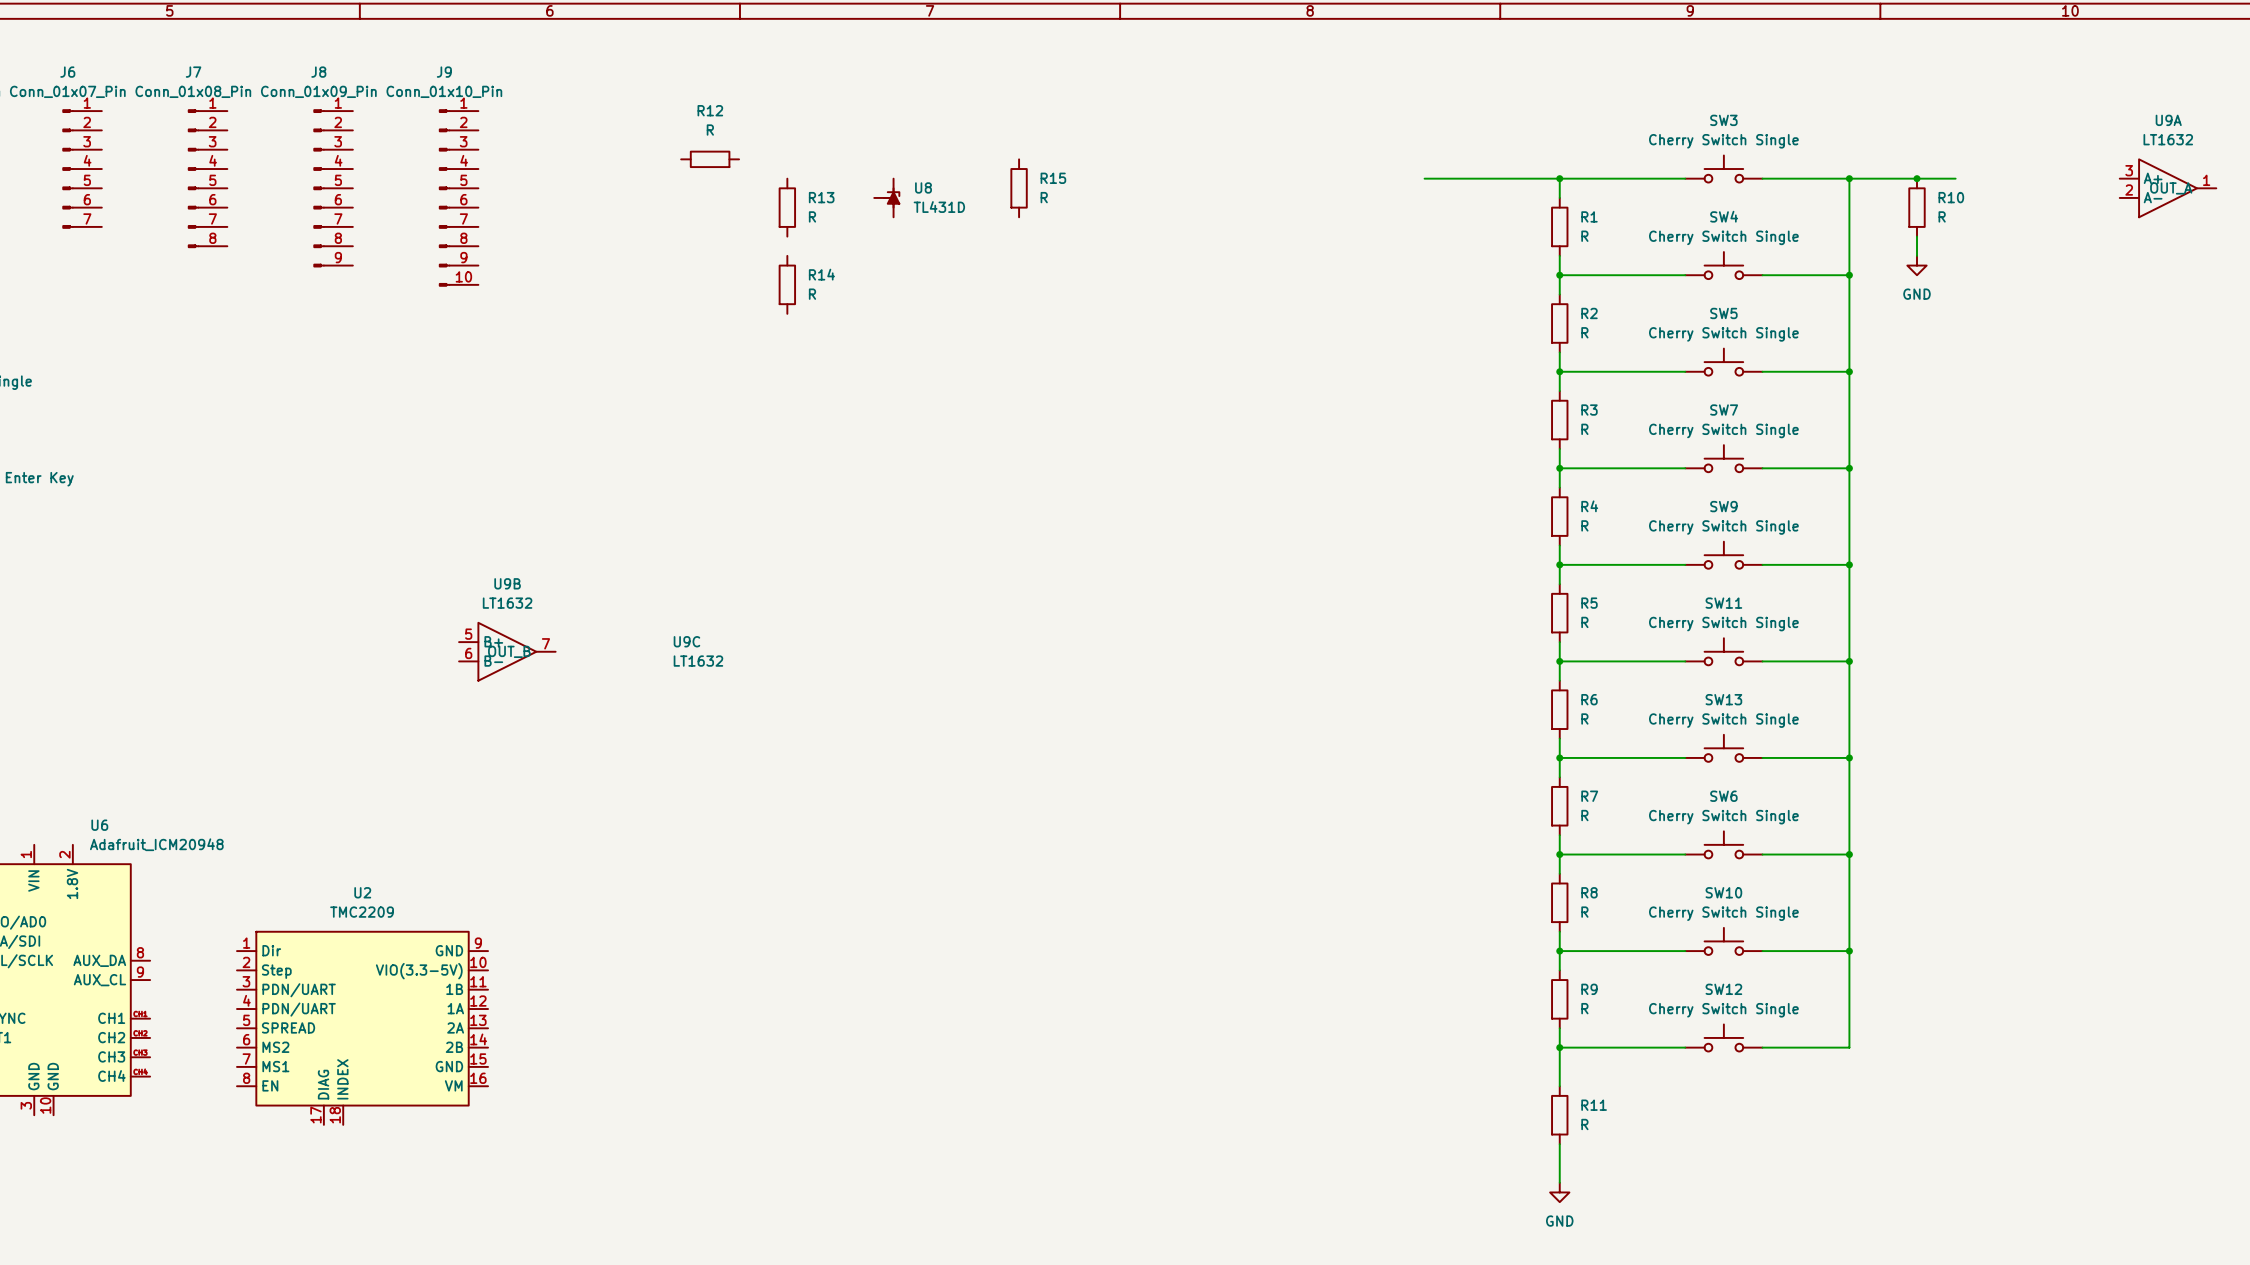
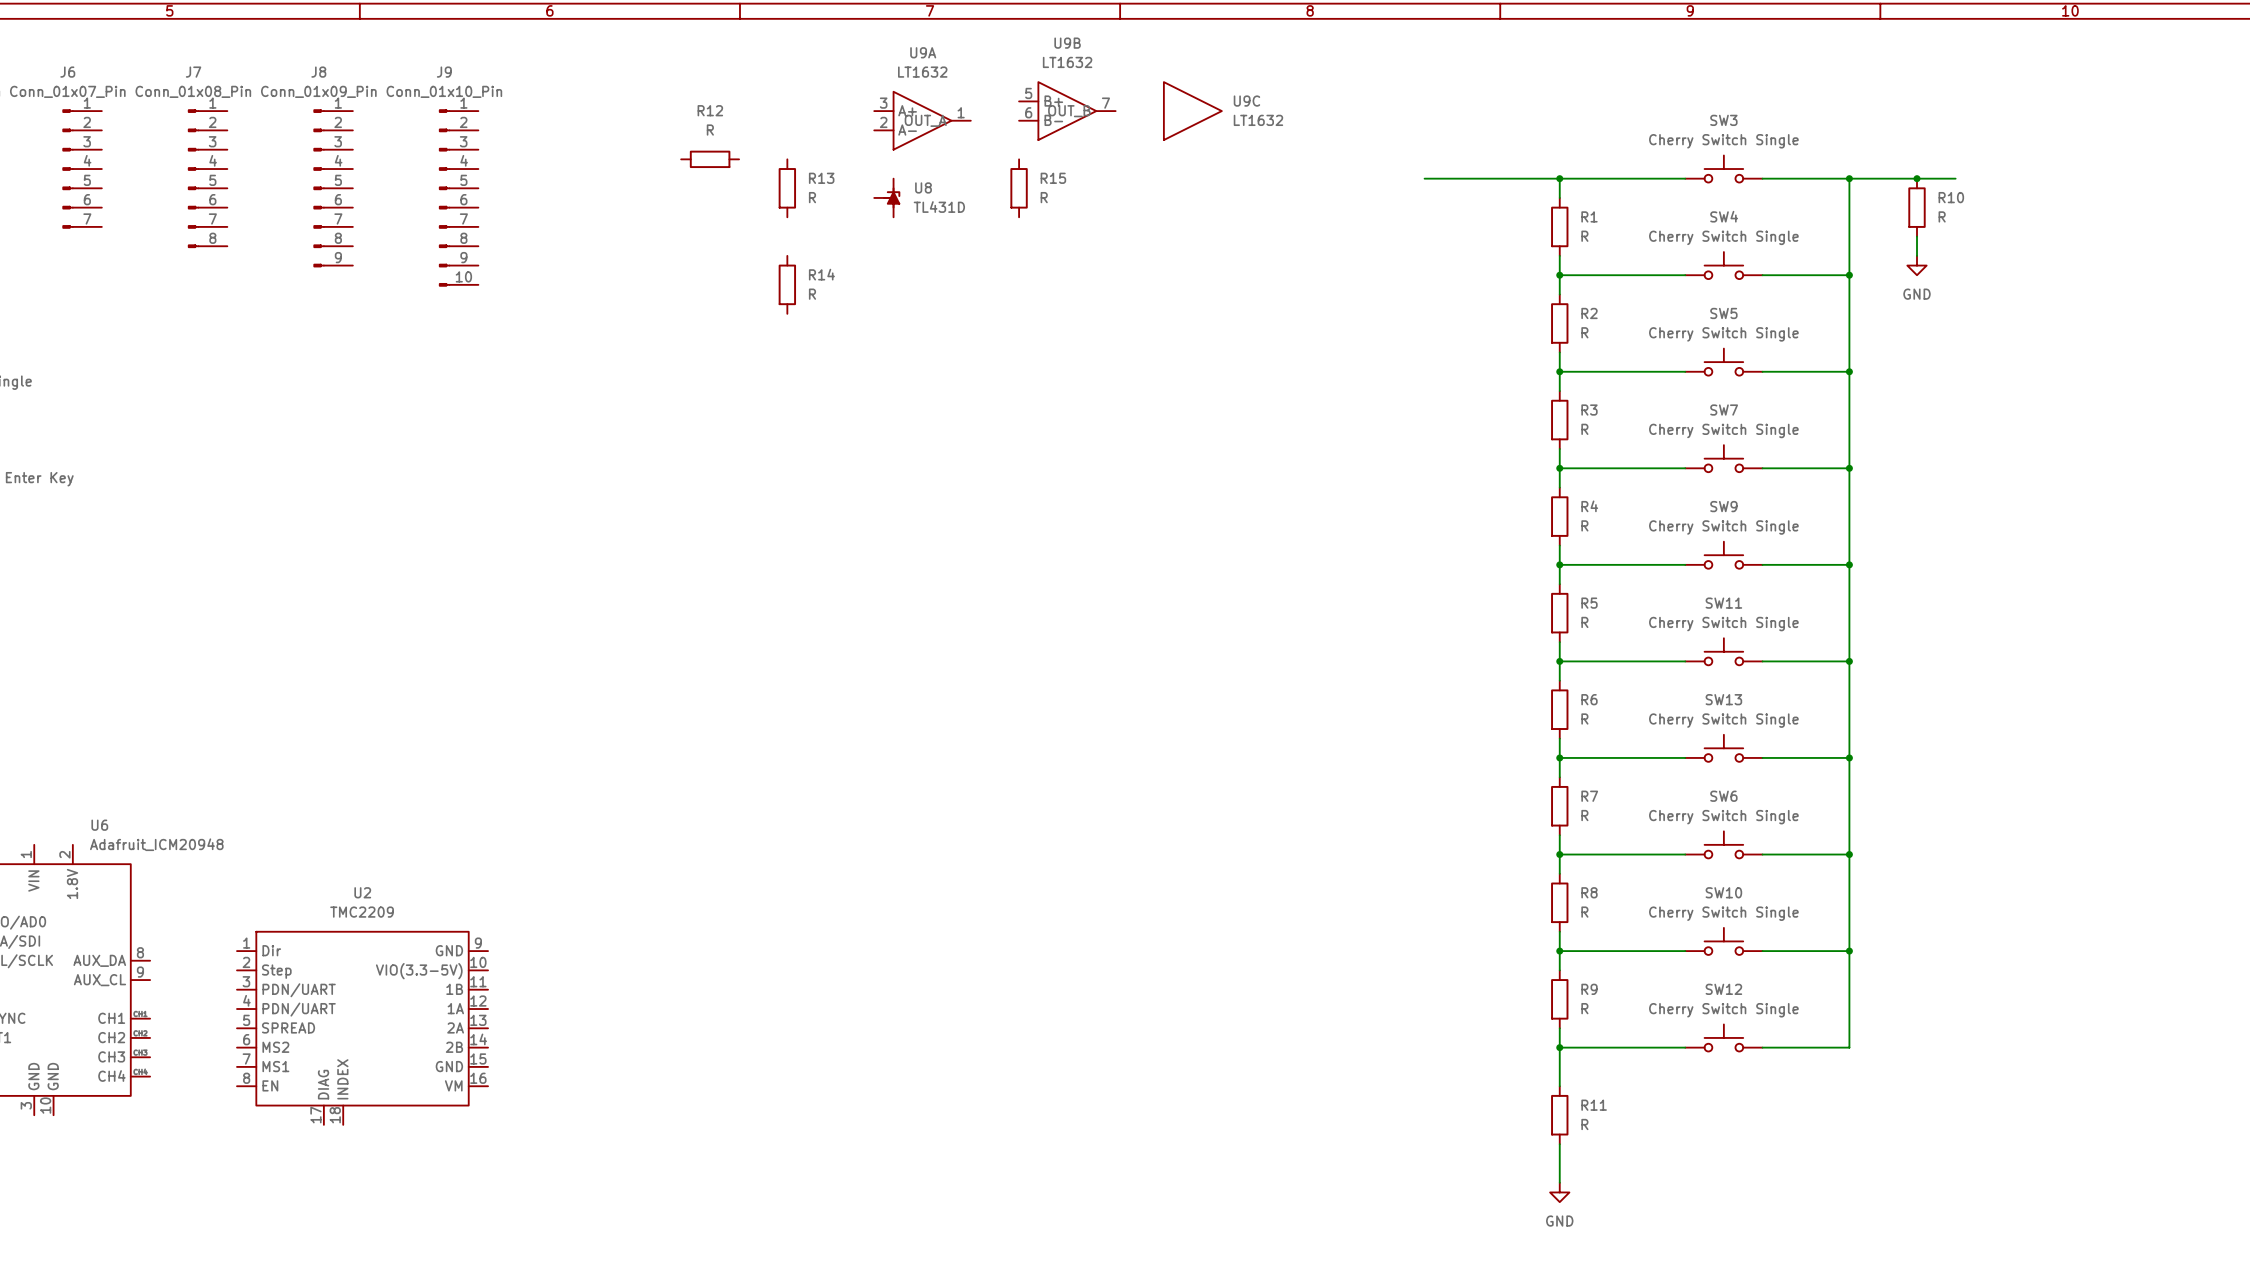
U9A position: (2168, 188) -> (922, 120)
R13 position: (787, 207) -> (787, 188)
U9C symbol: [673, 636, 723, 667] -> [1163, 82, 1222, 141]
U9C name position: U9C (686, 641) -> U9C (1246, 101)
U9B position: (507, 651) -> (1067, 111)
U9C value position: LT1632 (698, 661) -> LT1632 (1258, 120)

